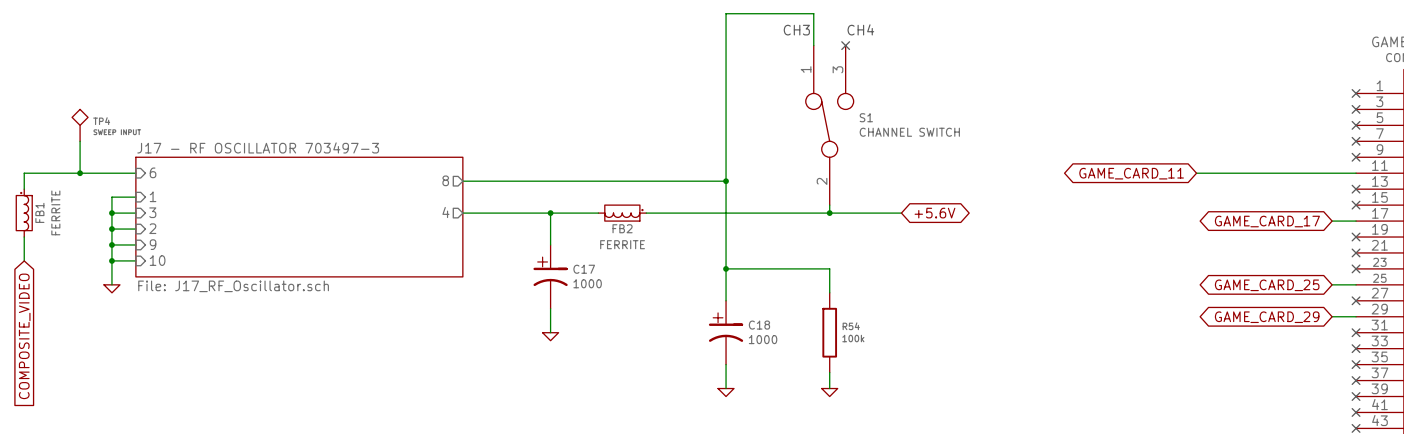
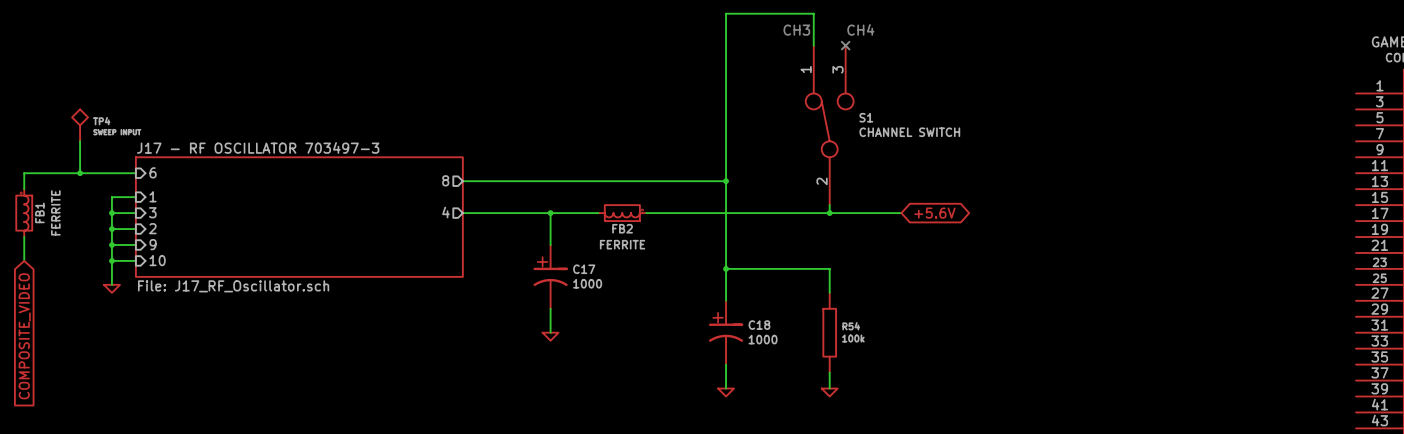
no-connect mark: (1356, 93) -> none
no-connect mark: (1356, 109) -> none
no-connect mark: (1356, 125) -> none
no-connect mark: (1356, 141) -> none
no-connect mark: (1356, 157) -> none
global label: GAME_CARD_11 (1131, 173) -> none
wire: (1196, 173) (1356, 173) -> none
no-connect mark: (1356, 189) -> none
no-connect mark: (1356, 205) -> none
global label: GAME_CARD_17 (1267, 221) -> none
wire: (1332, 221) (1356, 221) -> none
no-connect mark: (1356, 237) -> none
no-connect mark: (1356, 252) -> none
no-connect mark: (1356, 268) -> none
wire: (1332, 284) (1356, 284) -> none
global label: GAME_CARD_25 (1267, 285) -> none
no-connect mark: (1356, 300) -> none
wire: (1332, 316) (1356, 316) -> none
global label: GAME_CARD_29 (1267, 317) -> none
no-connect mark: (1356, 332) -> none
no-connect mark: (1356, 348) -> none
no-connect mark: (1356, 364) -> none
no-connect mark: (1356, 380) -> none
no-connect mark: (1356, 396) -> none
no-connect mark: (1356, 412) -> none
no-connect mark: (1356, 428) -> none

